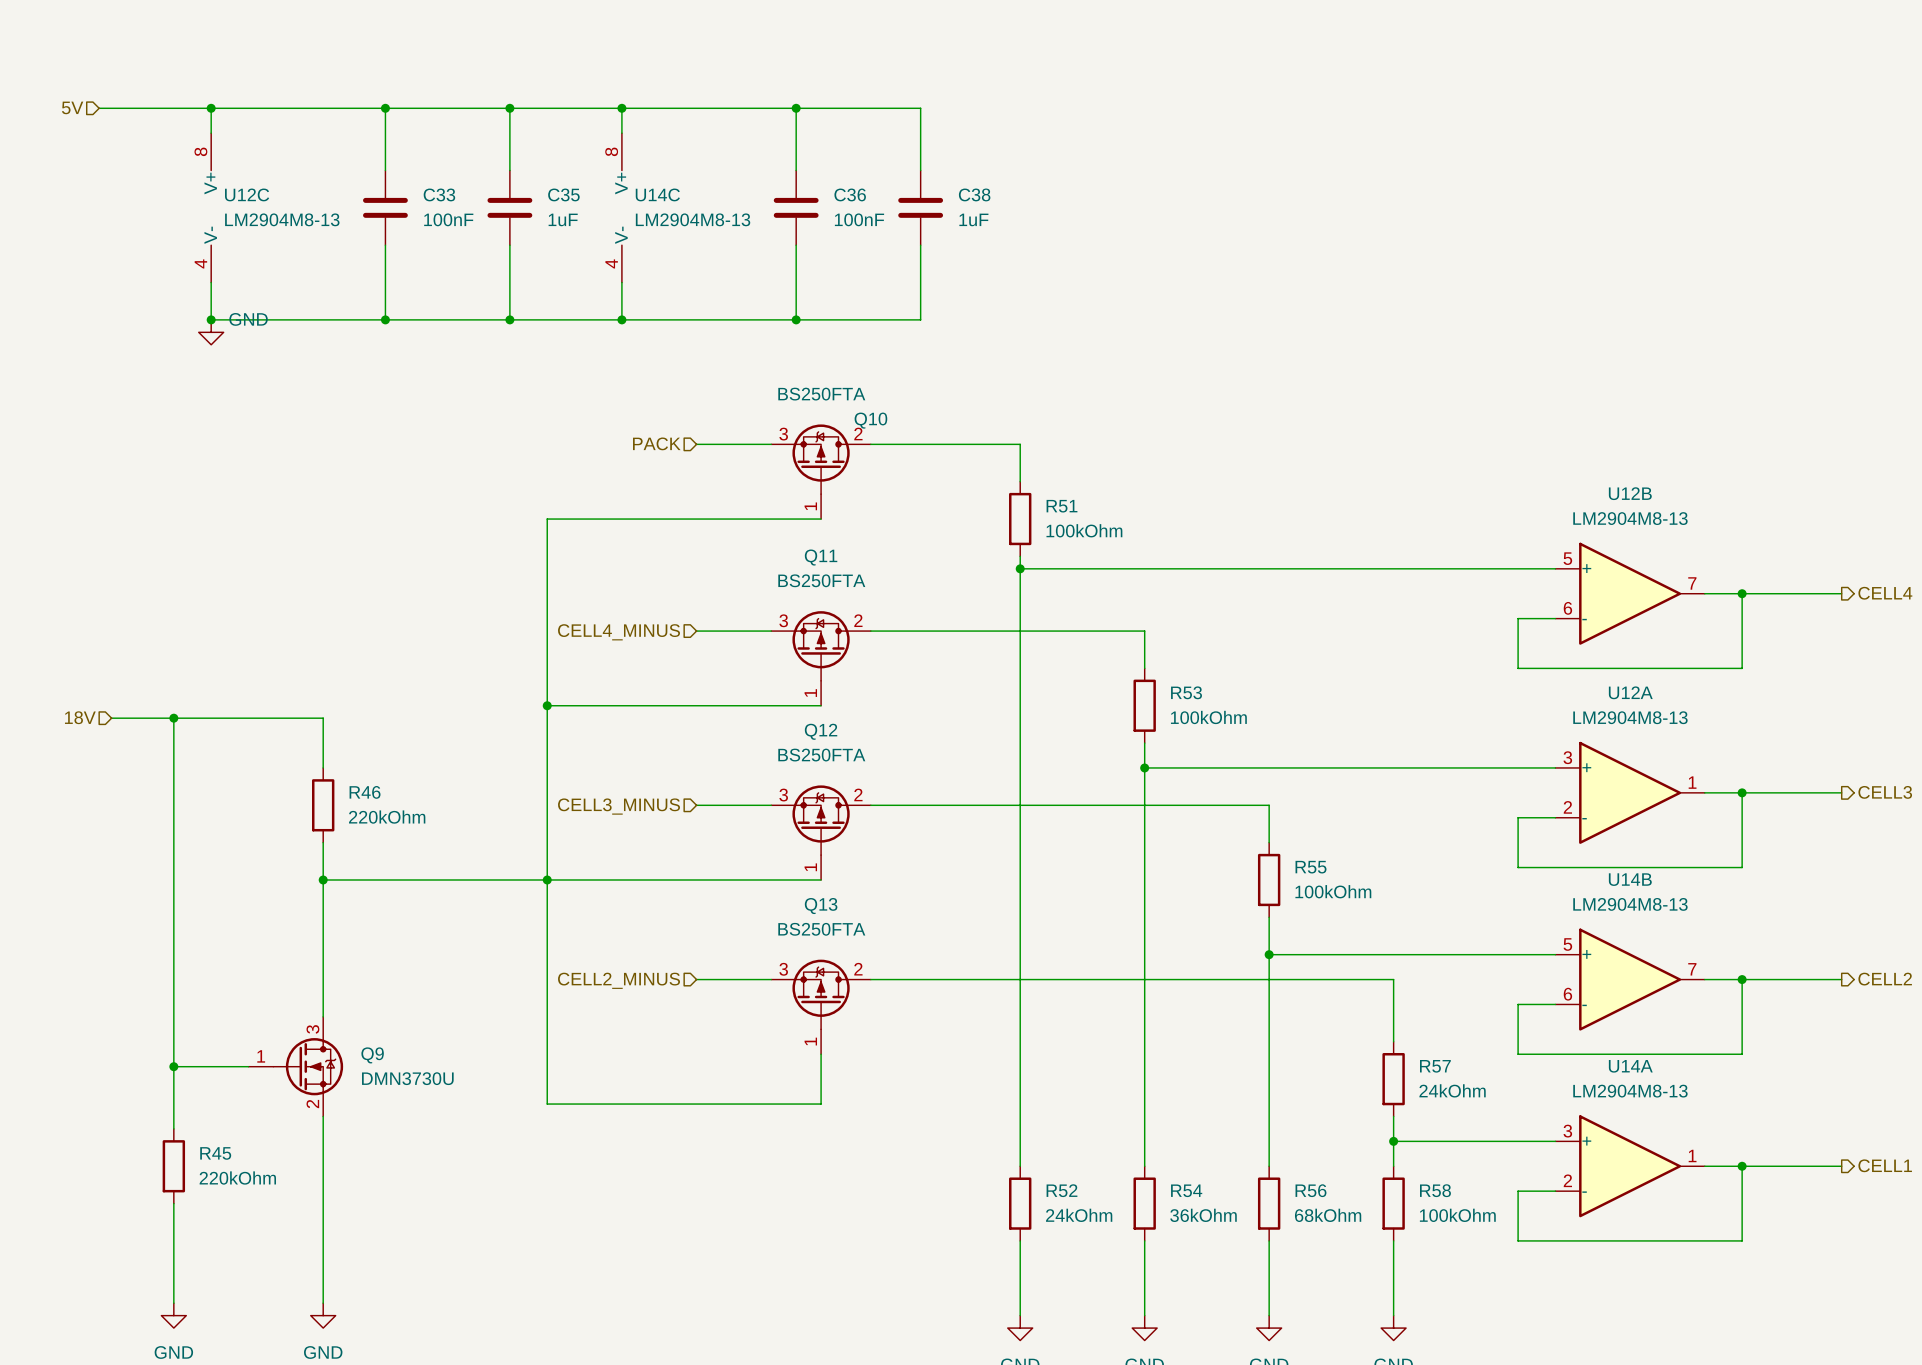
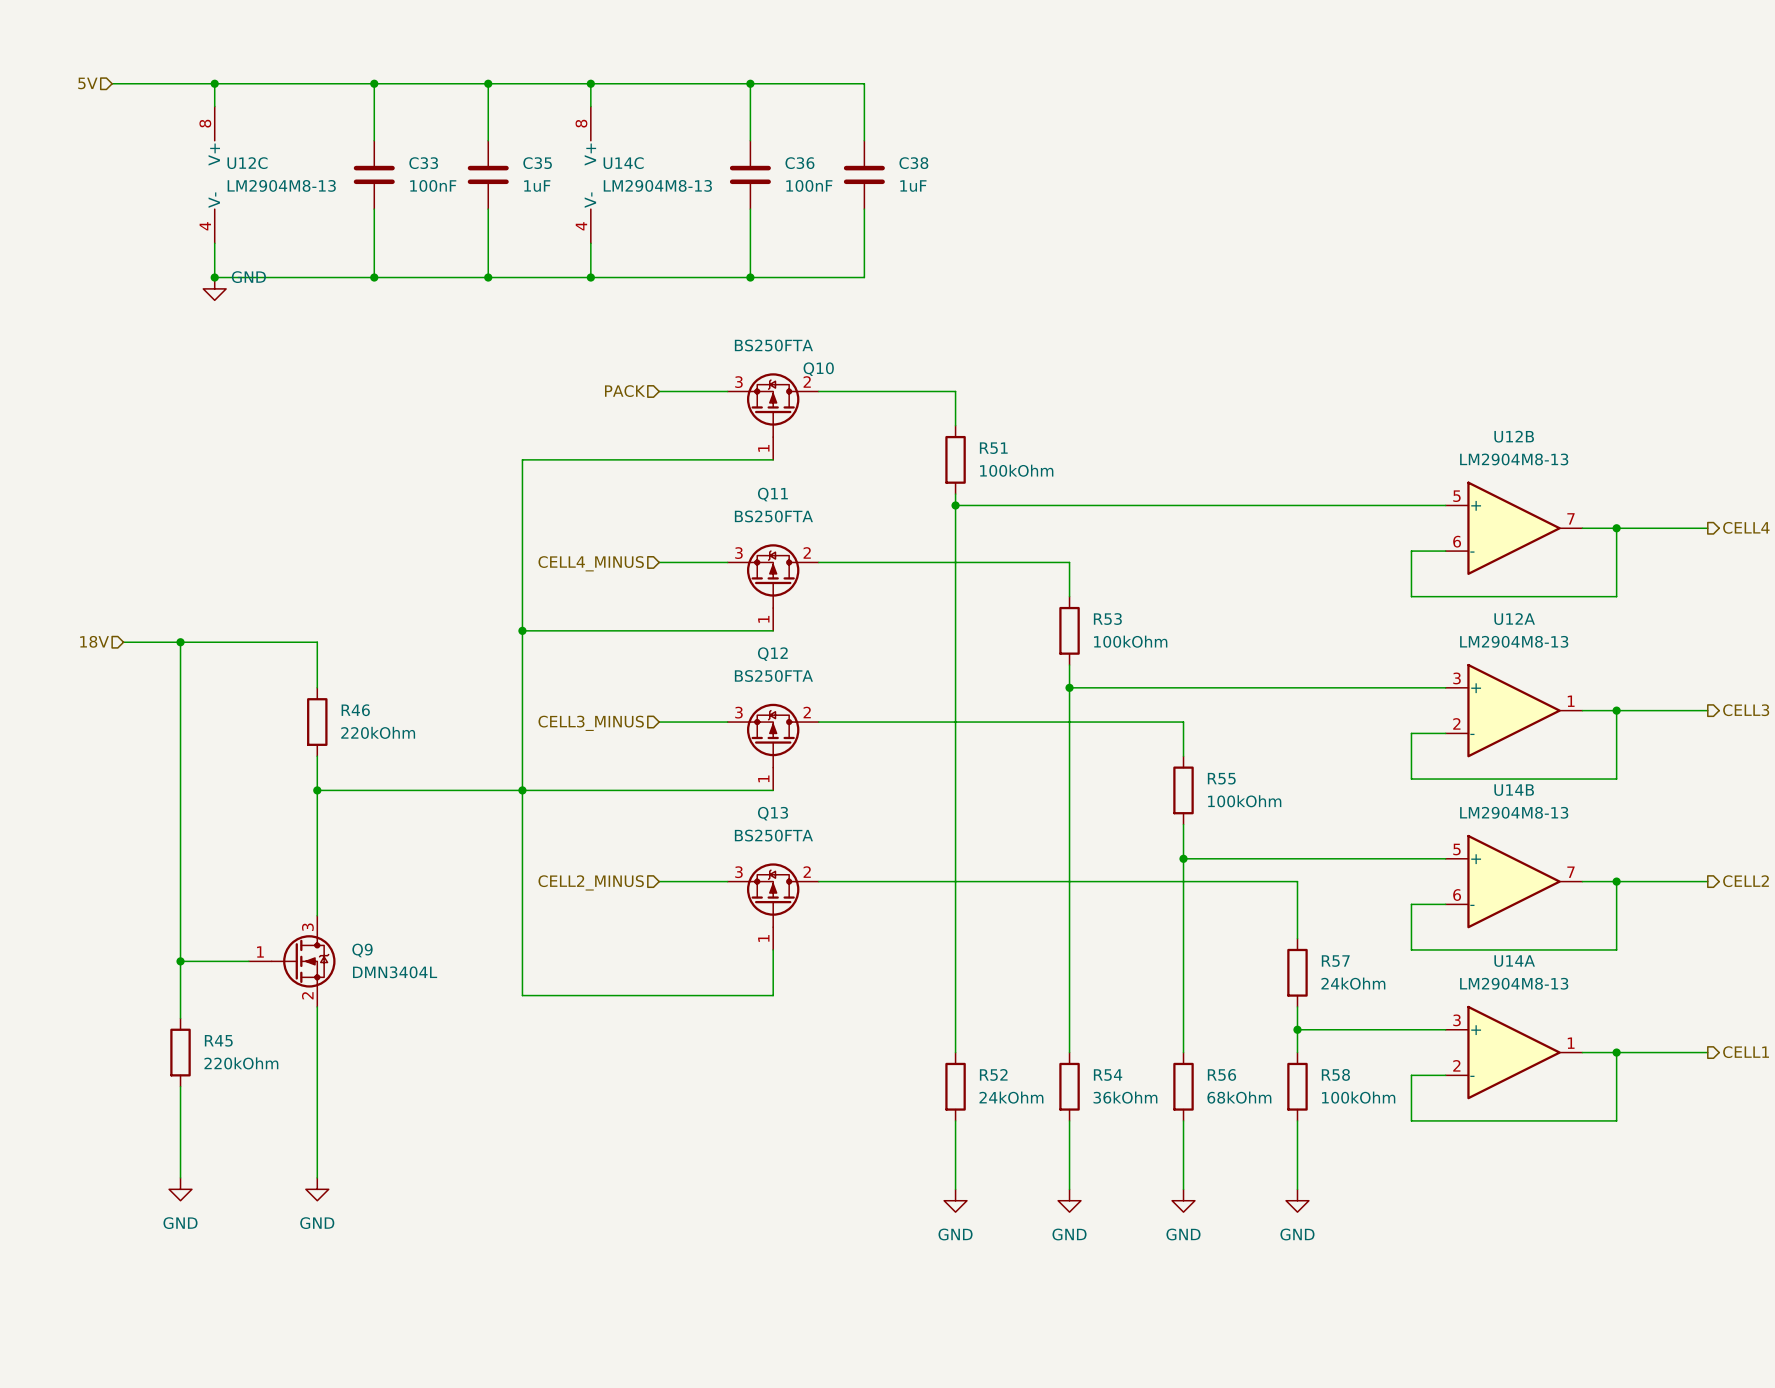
Q9 value: DMN3730U (407, 1078) -> DMN3404L (395, 972)

